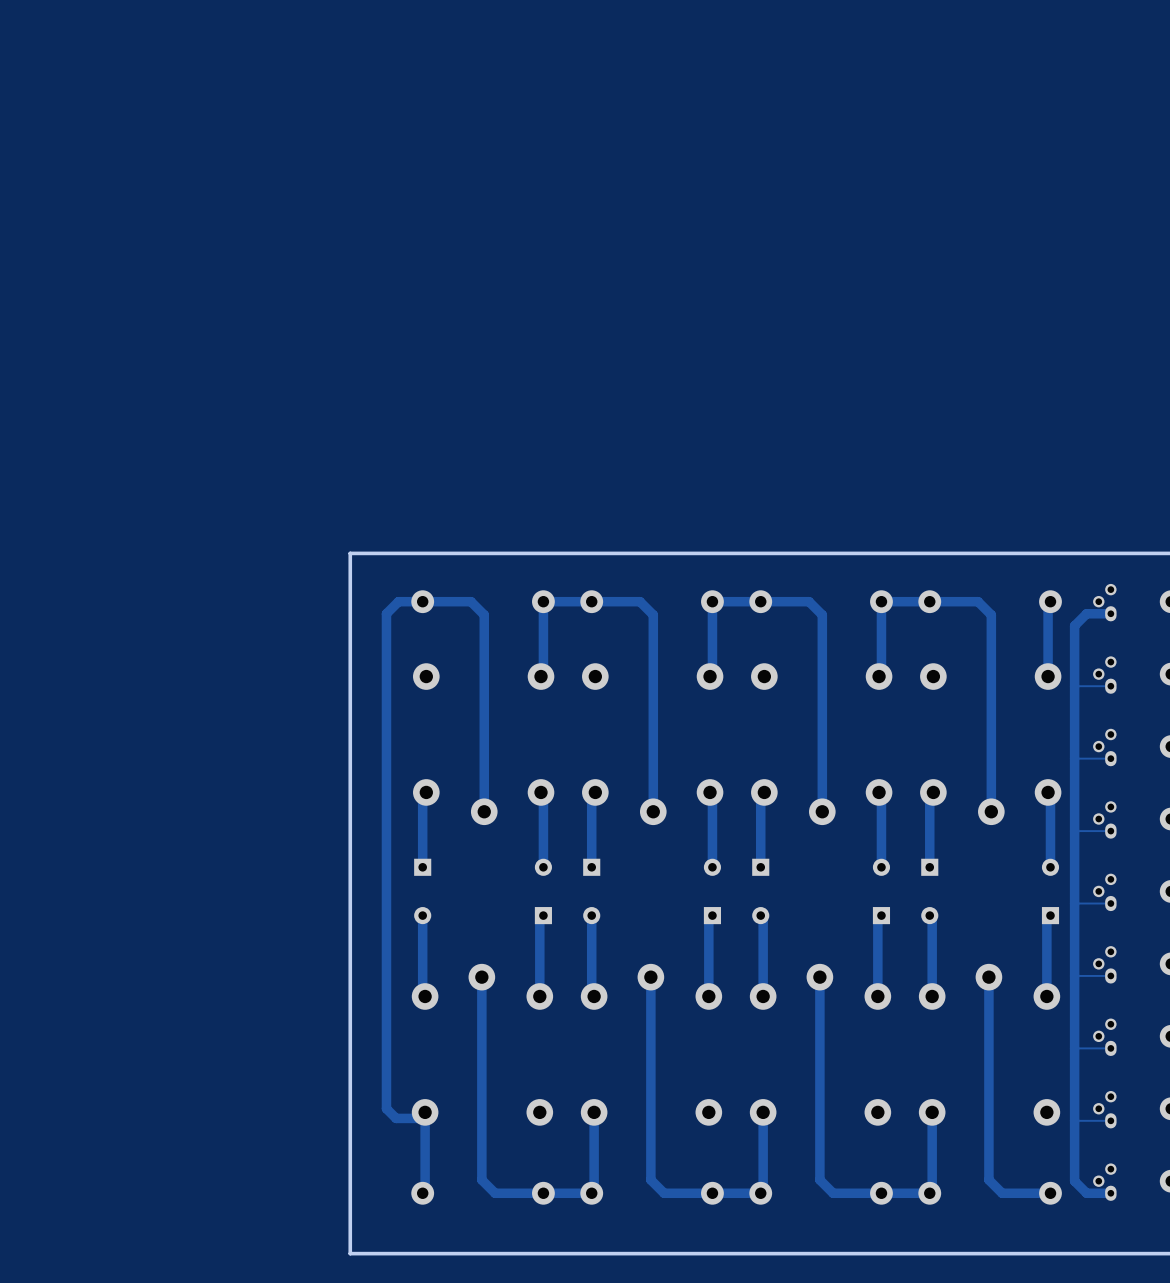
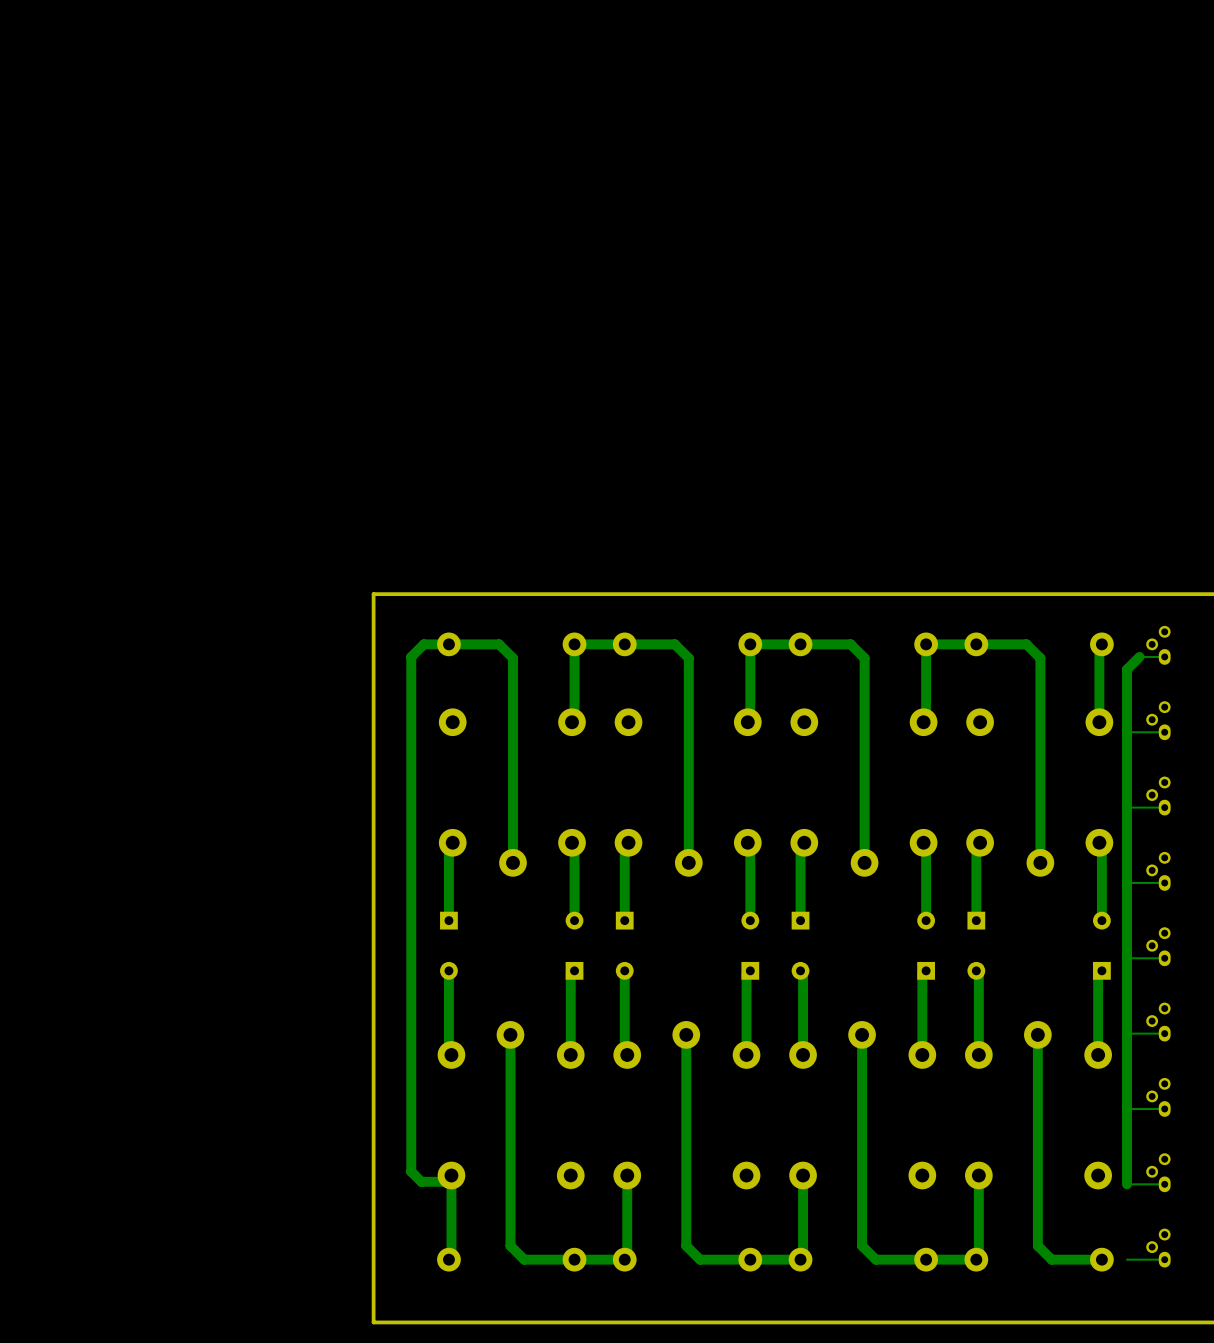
track width: thick (1110, 613) (1086, 613) -> thin (1164, 656) (1139, 656)
track: (1074, 1120) (1074, 1181) (1086, 1193) -> (1127, 1259) (1139, 1259)
track width: thick (1110, 1193) (1086, 1193) -> thin (1164, 1259) (1139, 1259)

